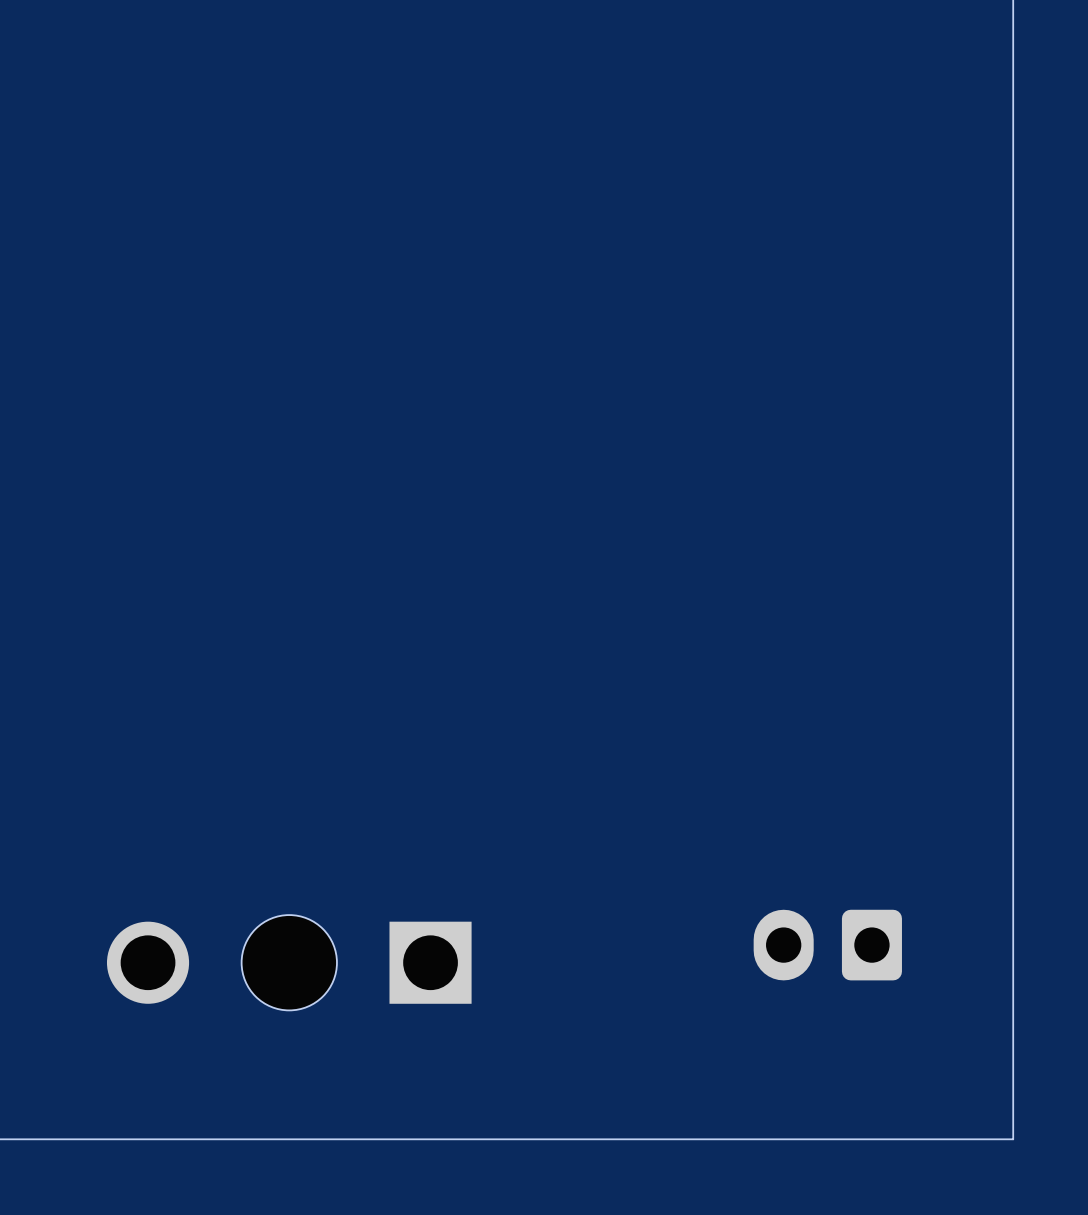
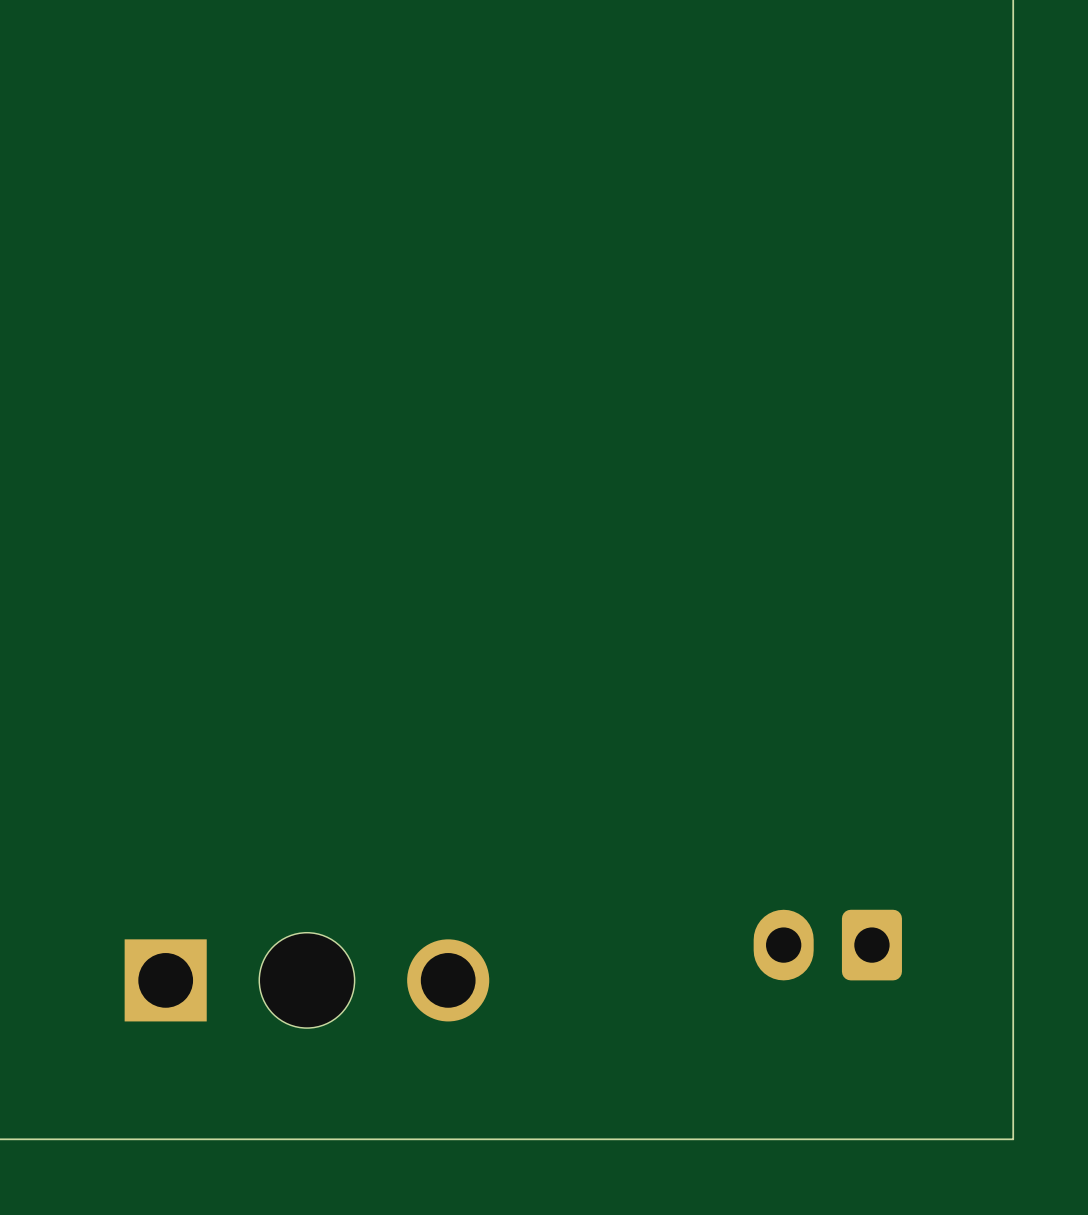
part rotation: 0° (289, 962) -> 180° (306, 980)

